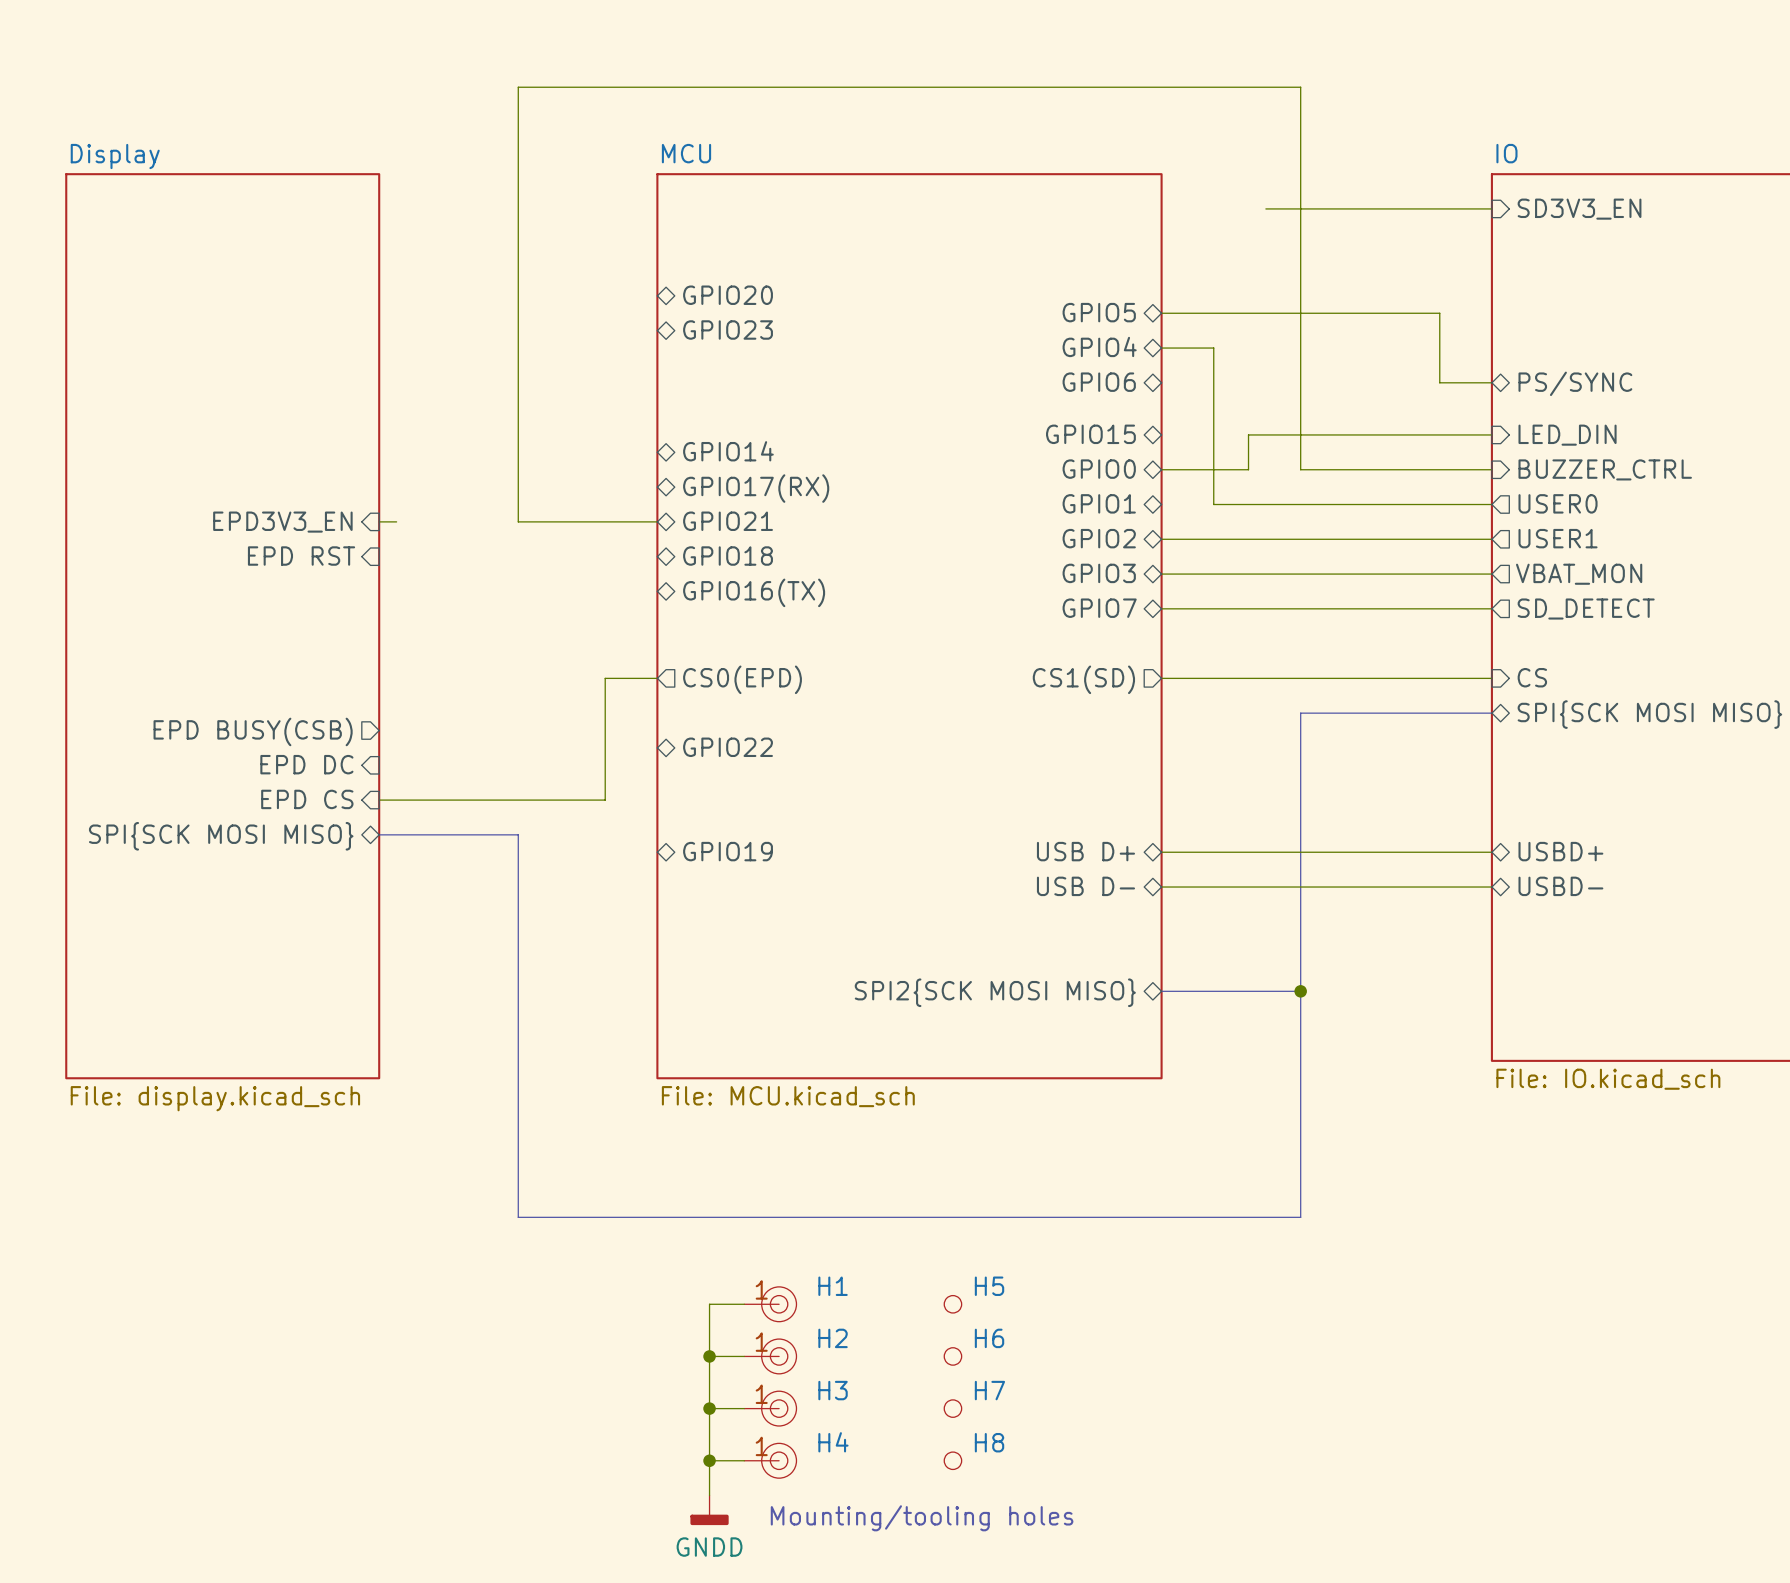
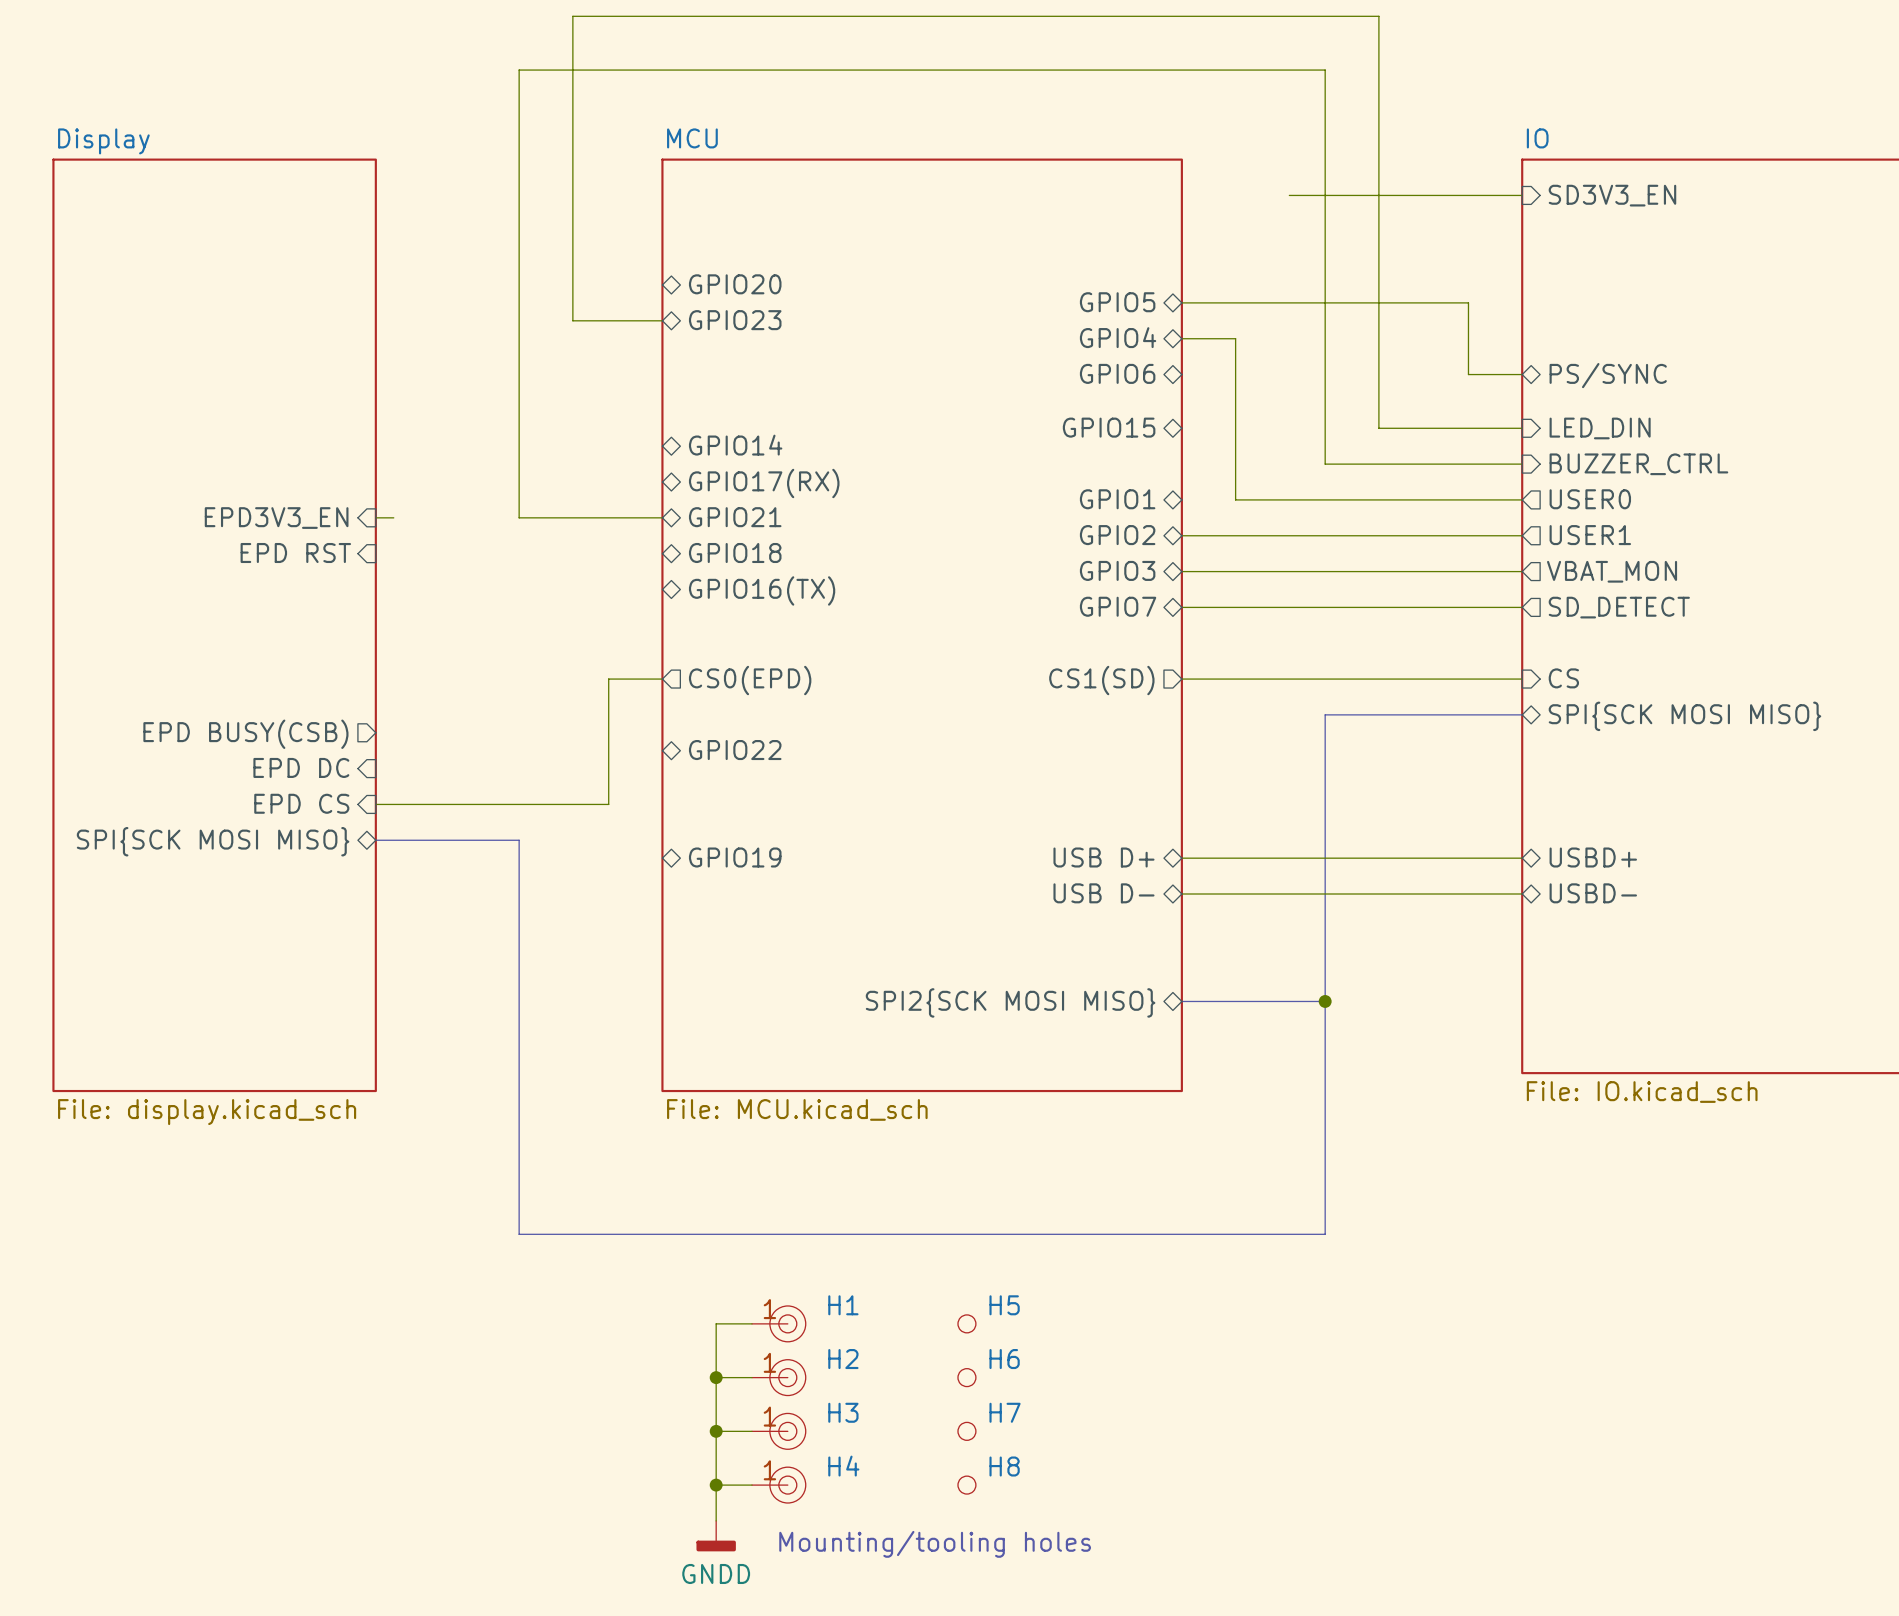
wire: (1352, 434) (1248, 434) (1248, 469) (1161, 469) -> (1378, 428) (1378, 16) (572, 16) (572, 320) (662, 320)
sheet pin: GPIO0 (1099, 469) -> none

